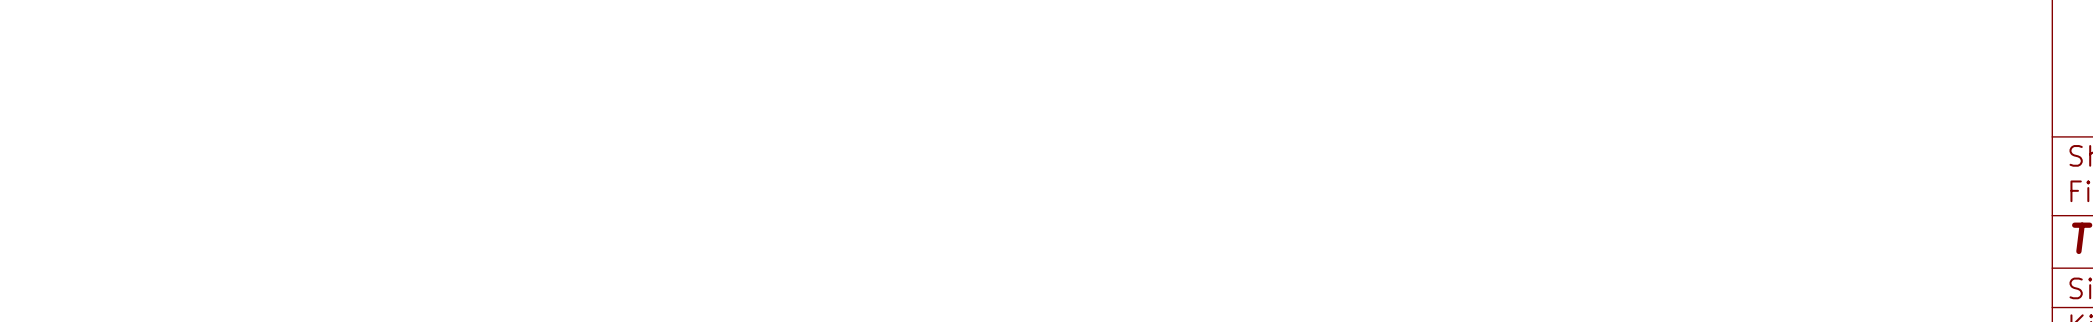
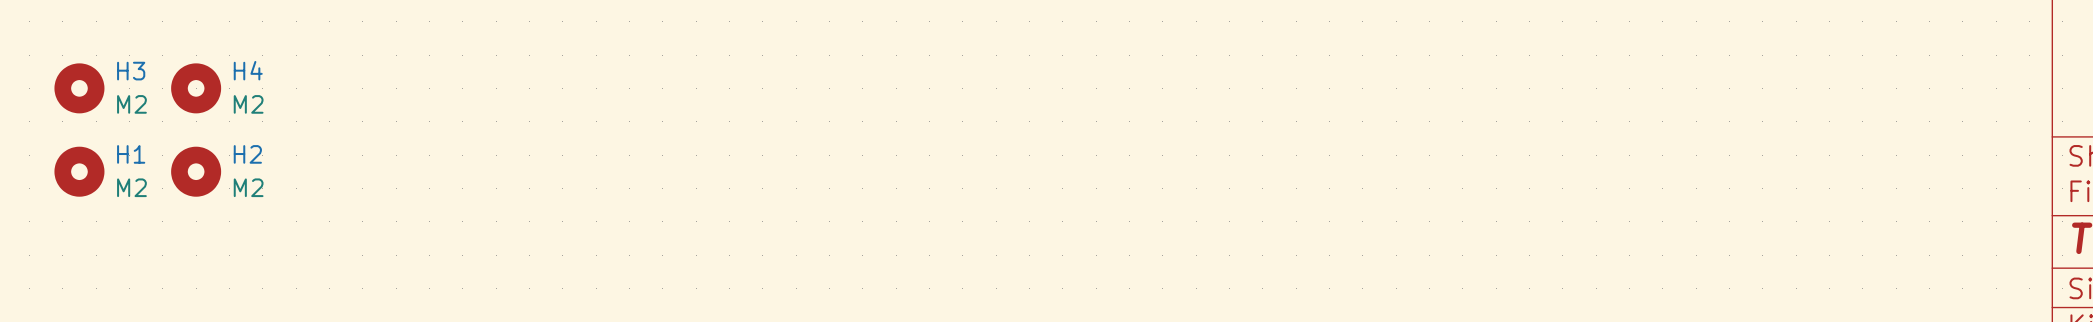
H3: none -> M2 (79, 88)
H4: none -> M2 (196, 88)
H1: none -> M2 (79, 171)
H2: none -> M2 (196, 171)

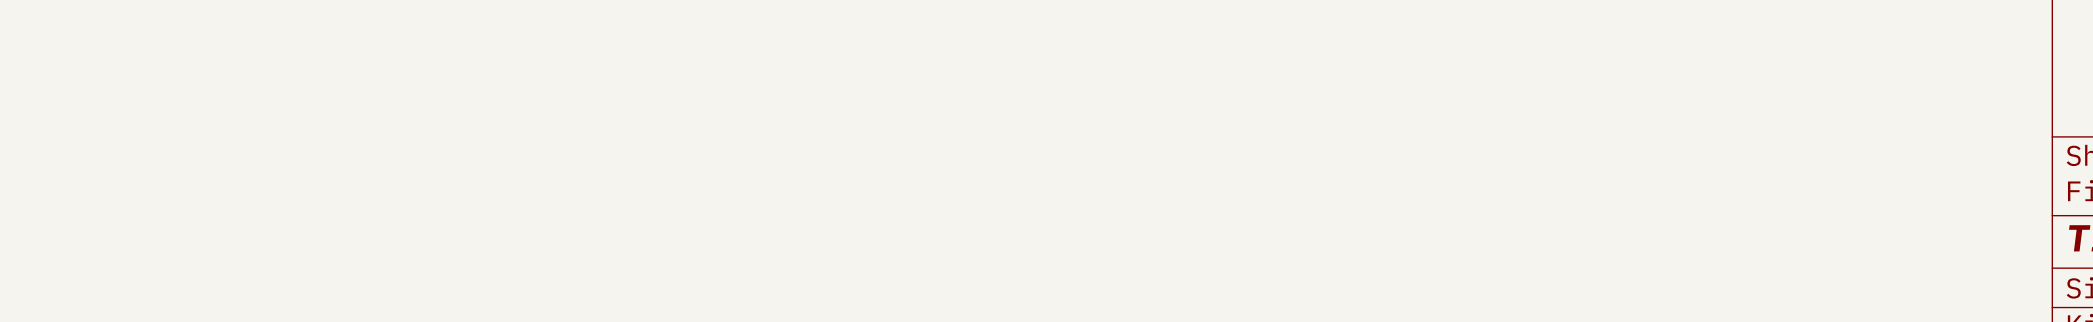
H3: M2 (79, 88) -> none
H4: M2 (196, 88) -> none
H1: M2 (79, 171) -> none
H2: M2 (196, 171) -> none

